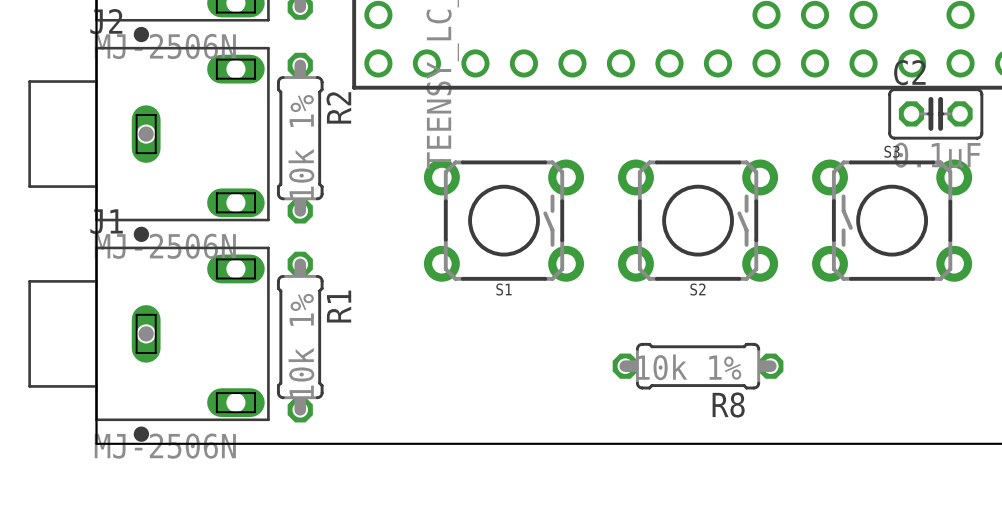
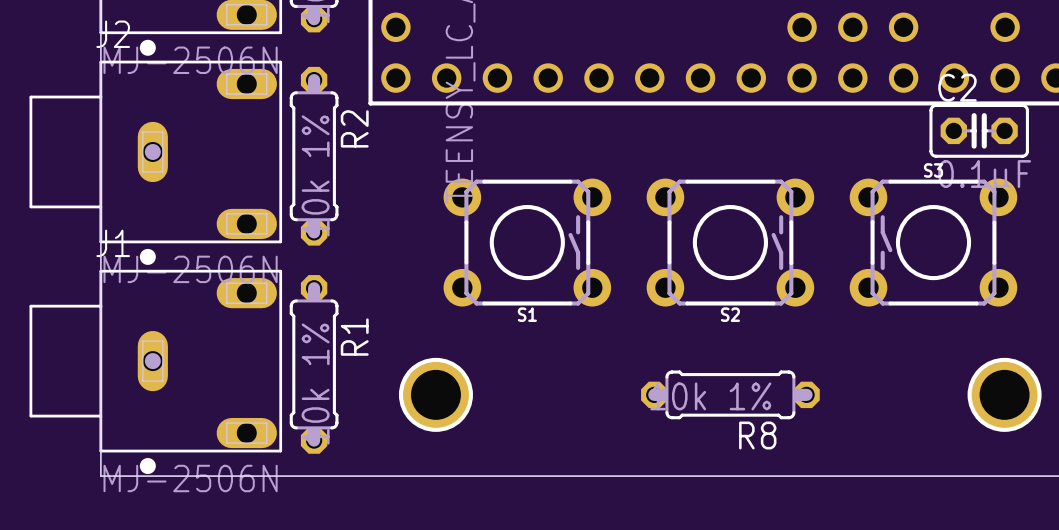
part: none -> (435, 394)
part: none -> (1004, 394)

